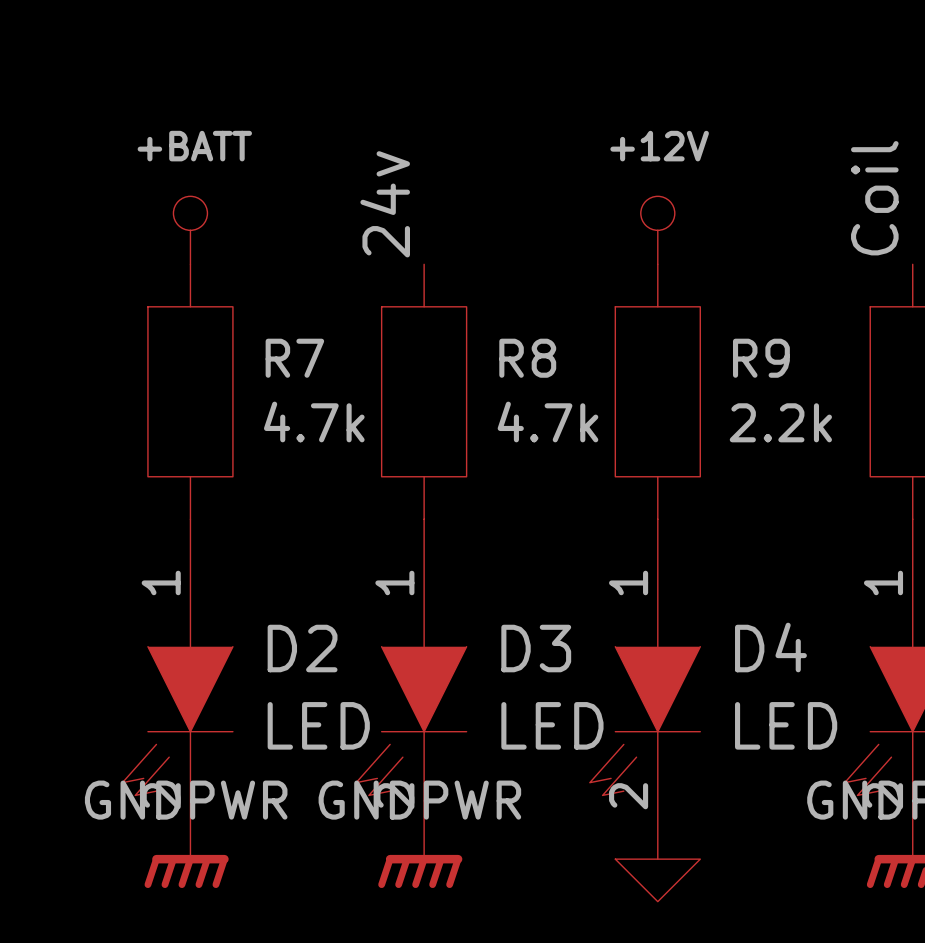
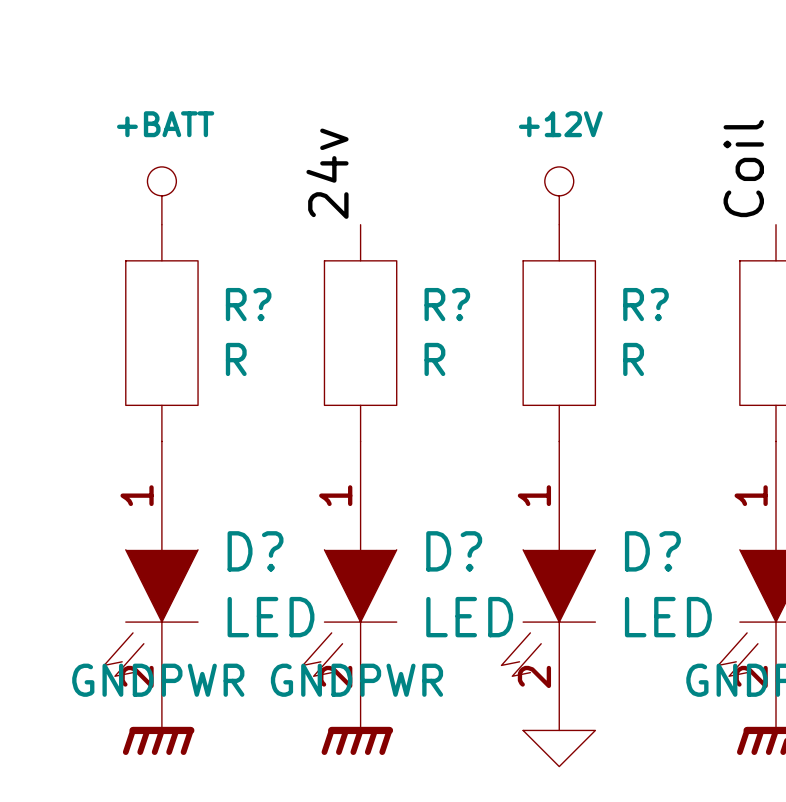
R7 name: R7 (294, 358) -> R? (248, 304)
R8 name: R8 (527, 358) -> R? (447, 304)
R9 name: R9 (761, 358) -> R? (645, 304)
R7 value: 4.7k (314, 421) -> R (236, 359)
R8 value: 4.7k (547, 421) -> R (434, 359)
R9 value: 2.2k (780, 422) -> R (633, 359)
D4 name: D4 (770, 647) -> D? (652, 551)
D2 name: D2 (302, 648) -> D? (255, 551)
D3 name: D3 (536, 648) -> D? (454, 551)

